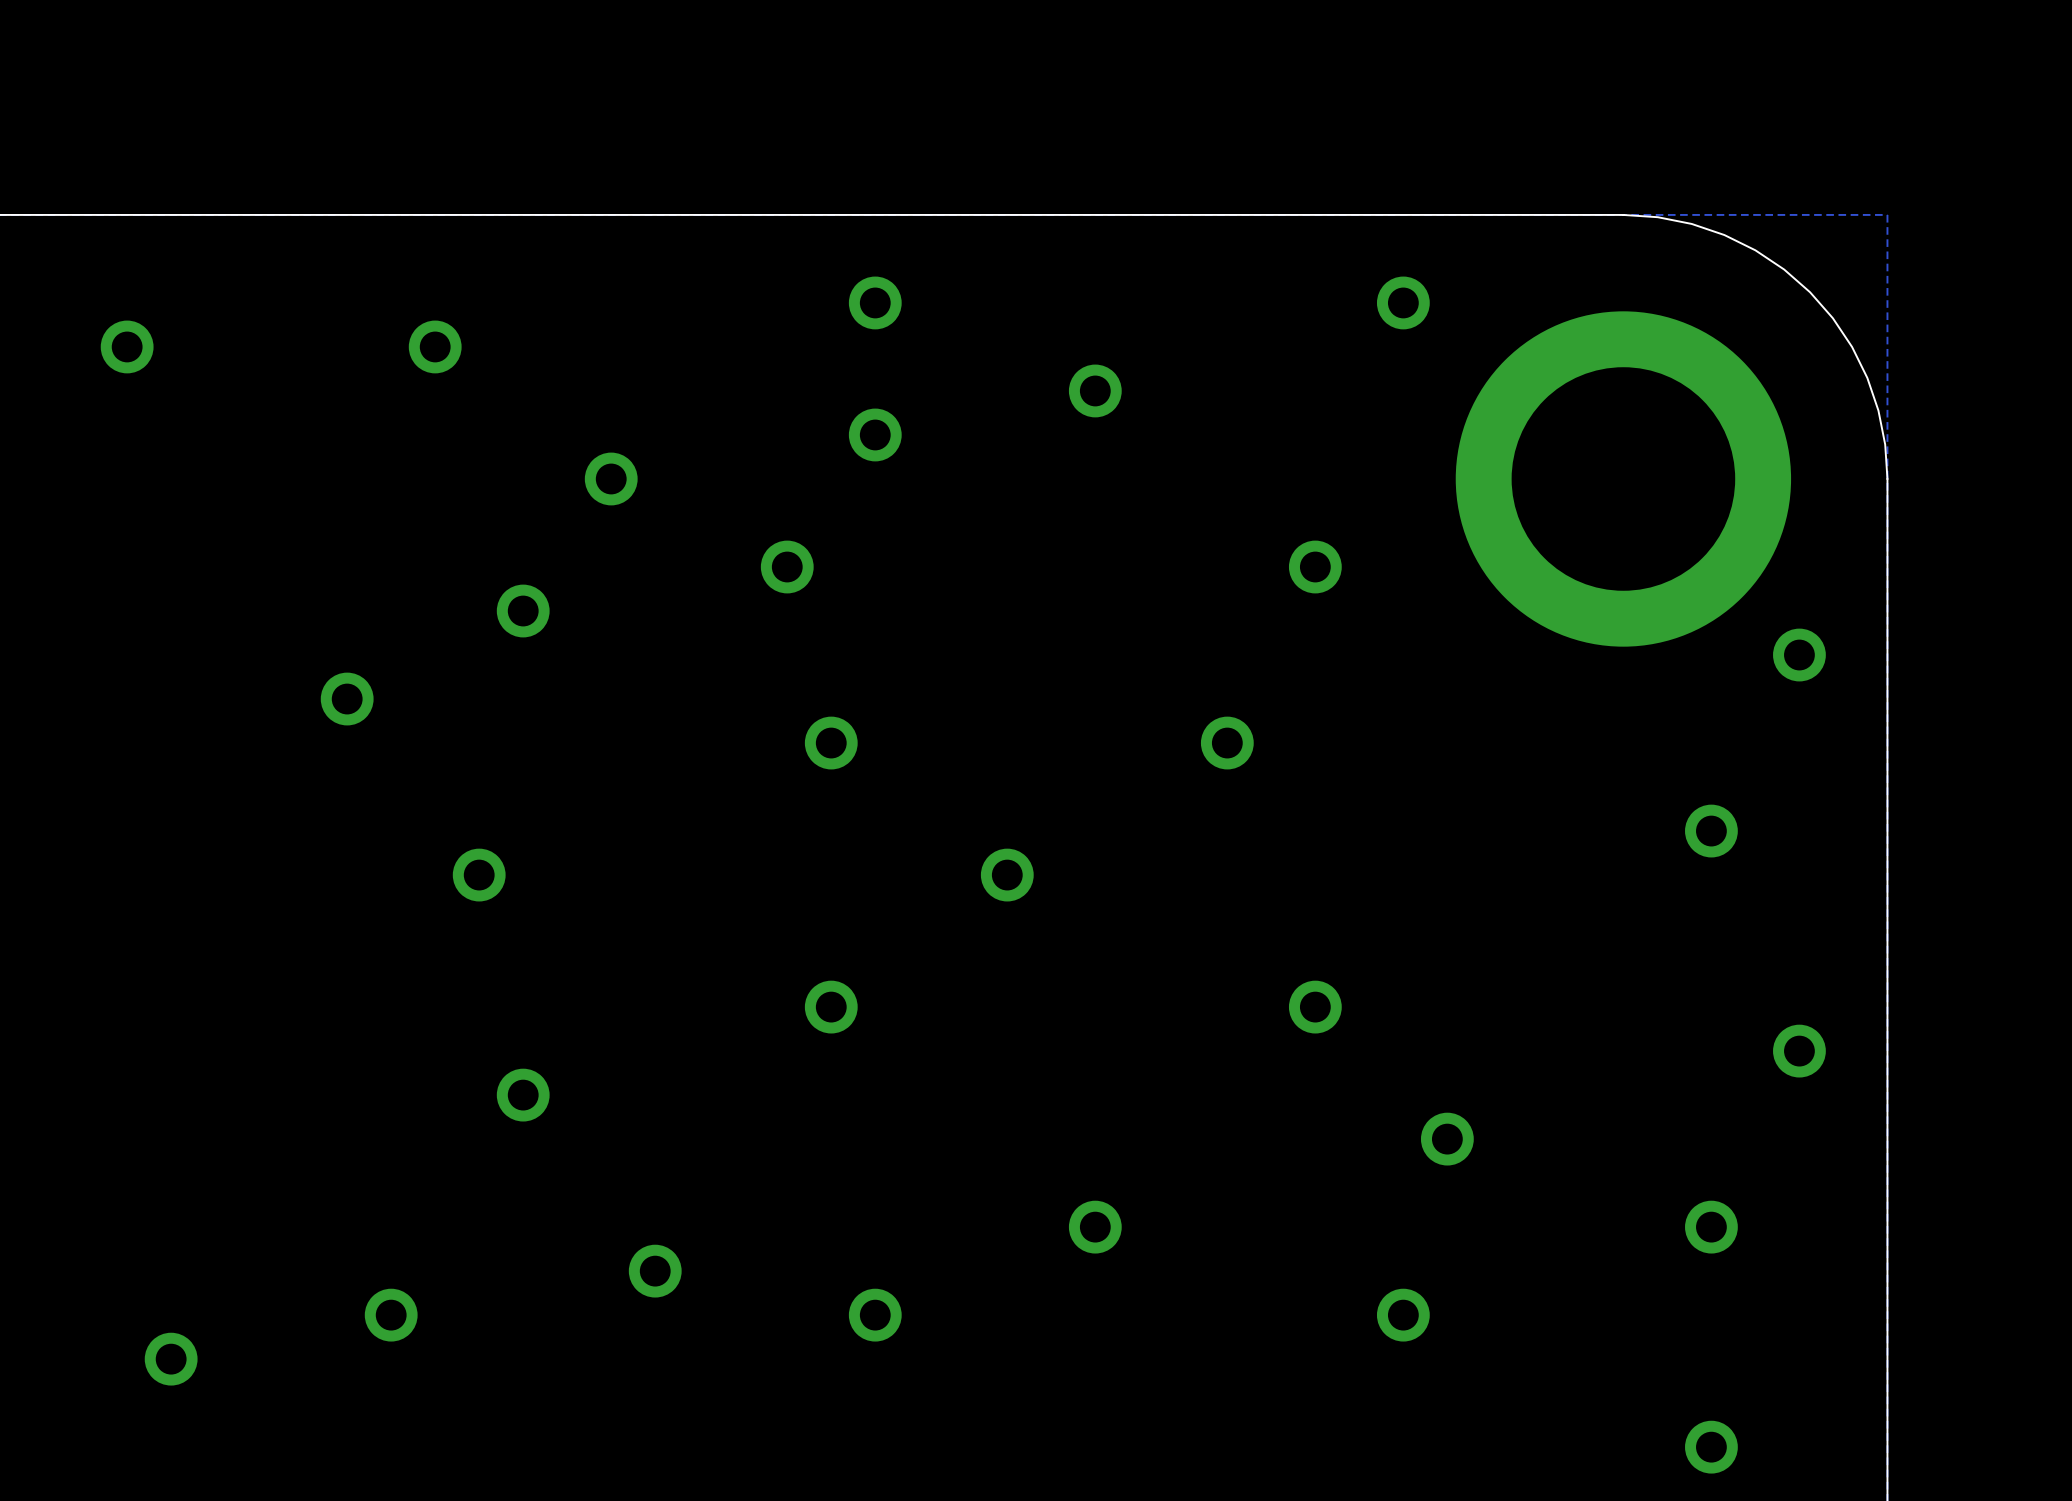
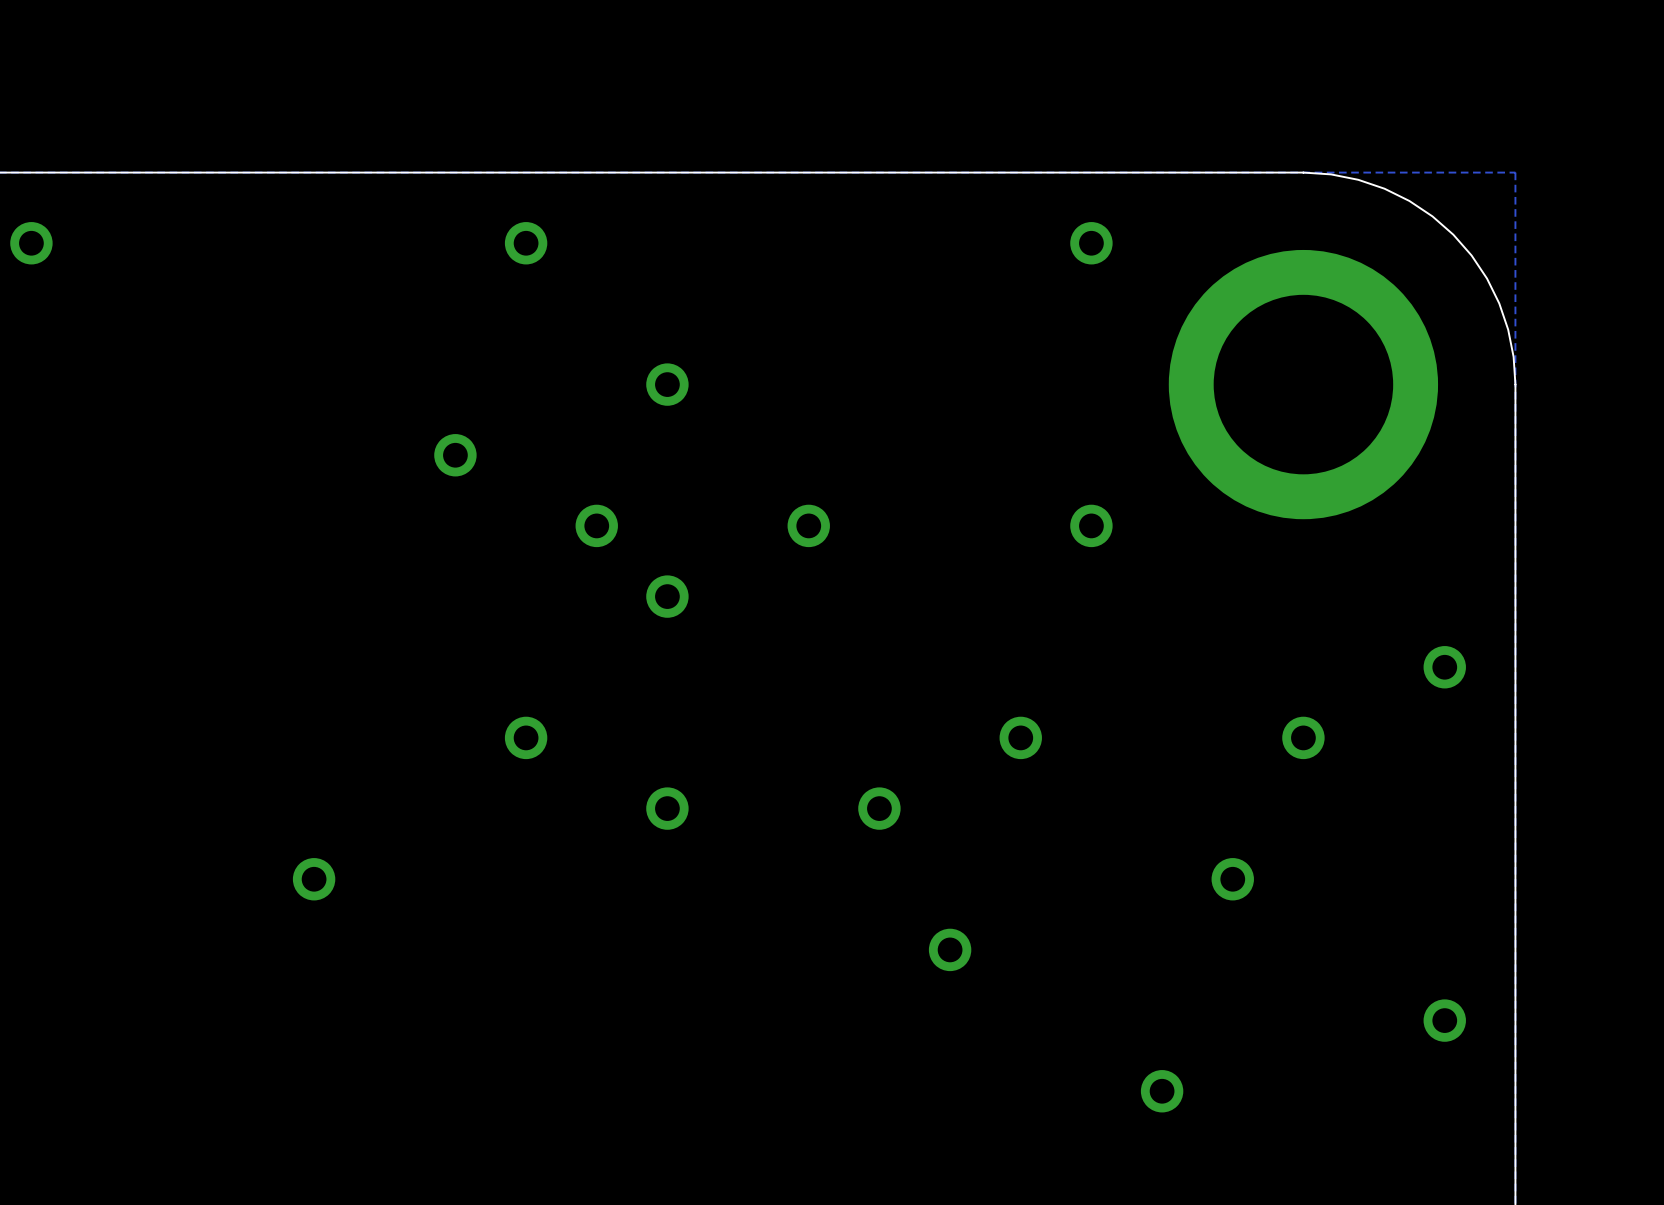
via: none -> (526, 243)
via: (875, 302) -> none
via position: (1403, 302) -> (1091, 243)
via position: (127, 346) -> (31, 243)
via: (435, 346) -> none
via: (1095, 390) -> none
via position: (875, 434) -> (667, 384)
via: (611, 478) -> none
via: (787, 567) -> none
via: (1315, 567) -> none
via position: (523, 611) -> (455, 455)
via: none -> (596, 525)
via: none -> (808, 525)
via: none -> (1091, 525)
via: (1799, 655) -> none
via: (347, 699) -> none
via: (1227, 743) -> none
via: (1711, 831) -> none
via: none -> (1444, 667)
via: (479, 875) -> none
via: (1007, 875) -> none
via: none -> (526, 737)
via: none -> (1020, 737)
via: none -> (1303, 737)
via: none -> (879, 808)
via: (1315, 1007) -> none
via: (1799, 1051) -> none
via: none -> (314, 879)
via: (523, 1095) -> none
via position: (1447, 1139) -> (1232, 879)
via position: (1095, 1227) -> (950, 949)
via: (1711, 1227) -> none
via: (655, 1271) -> none
via: none -> (1444, 1020)
via: (391, 1315) -> none
via: (875, 1315) -> none
via position: (1403, 1315) -> (1162, 1091)
via: (171, 1359) -> none
via: (1711, 1447) -> none

